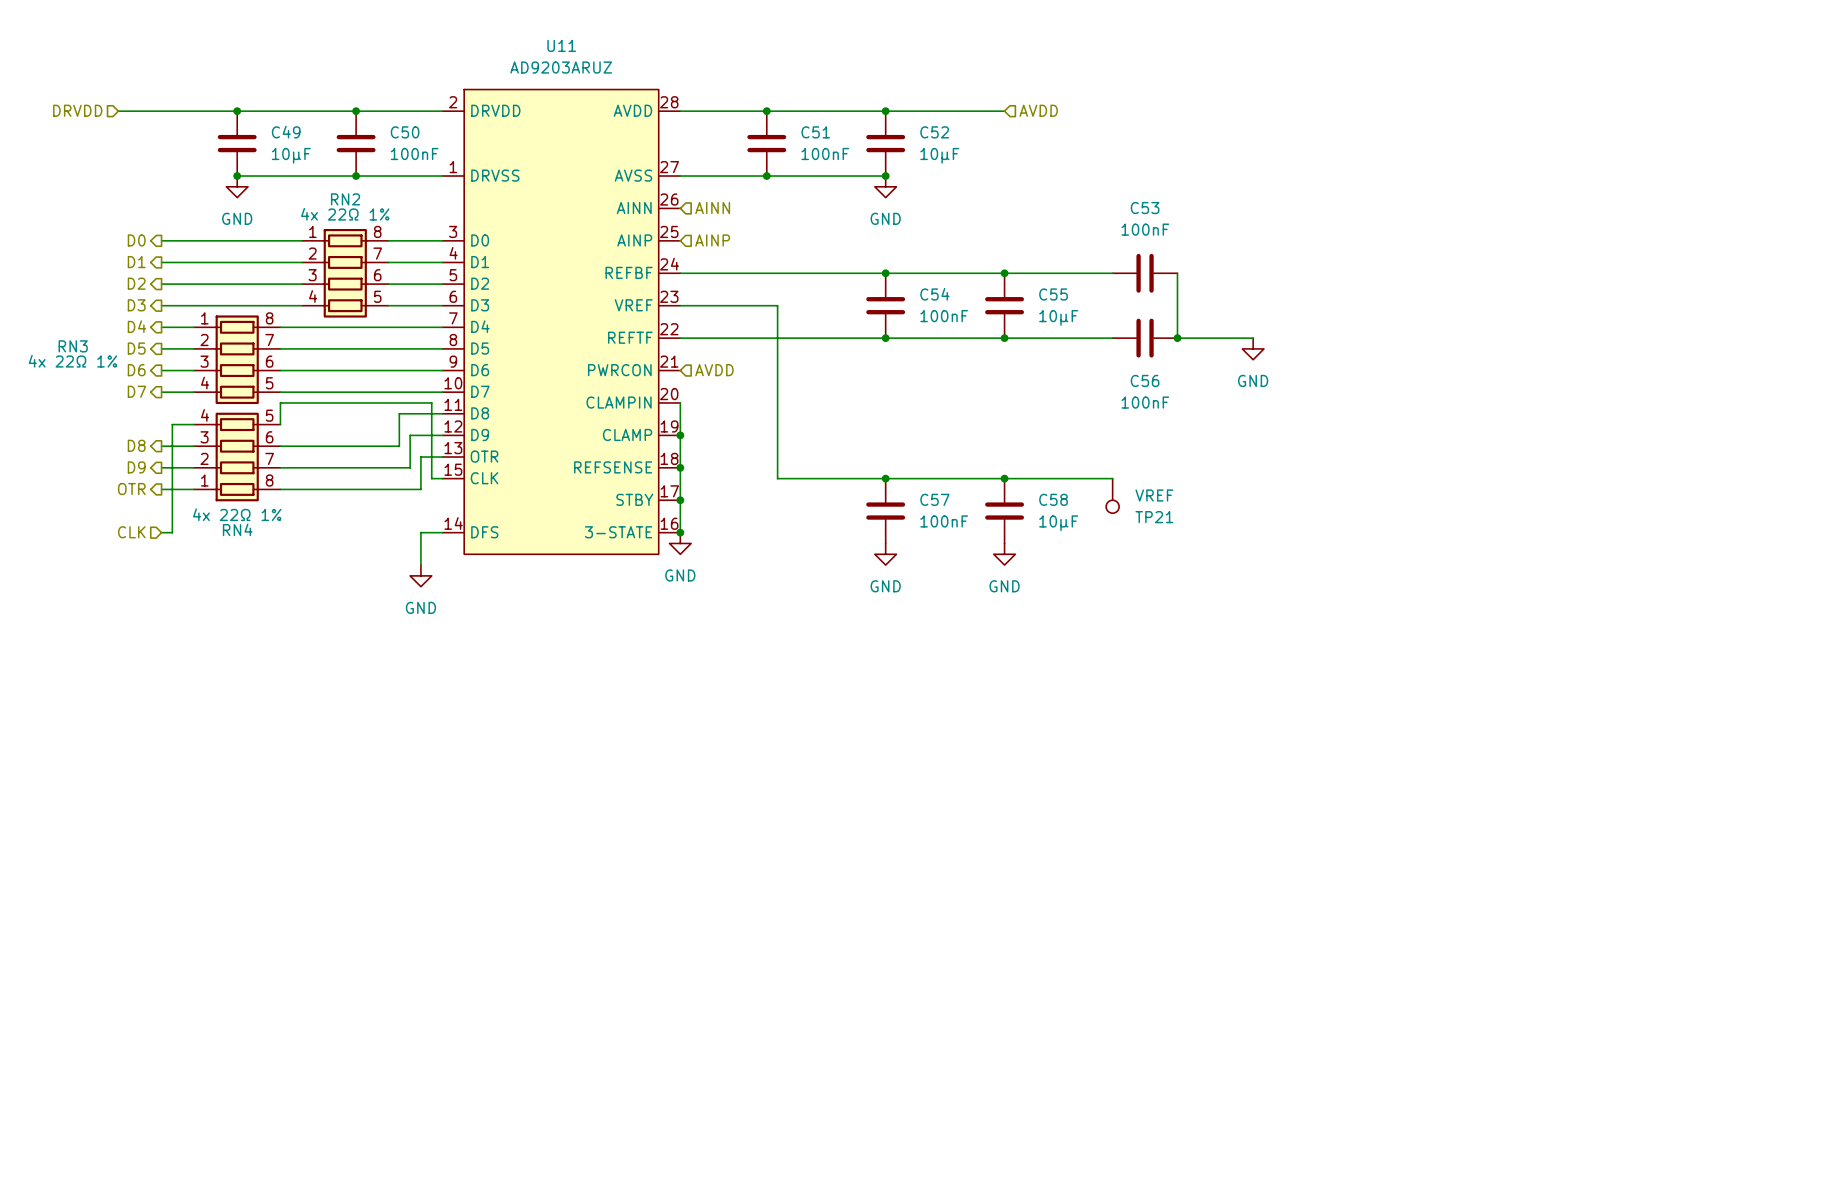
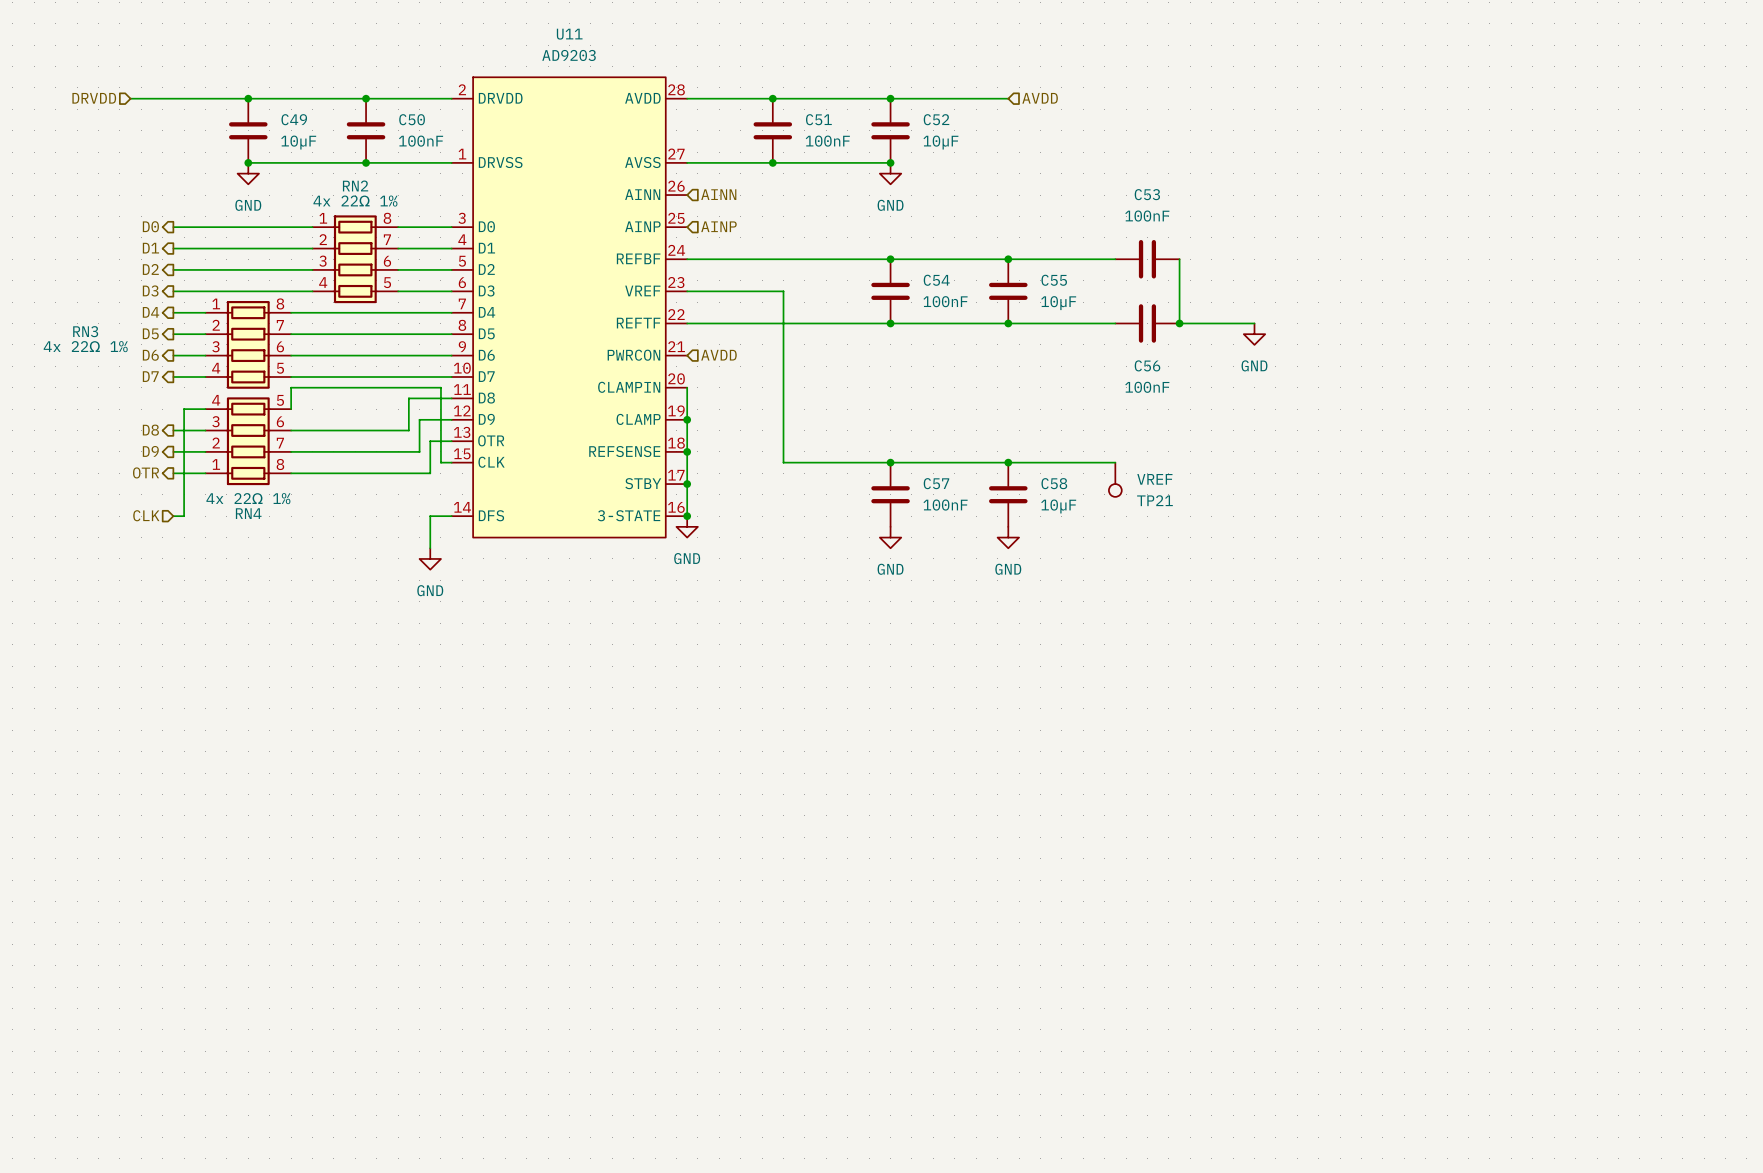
U11 value: AD9203ARUZ (561, 67) -> AD9203 (569, 55)

